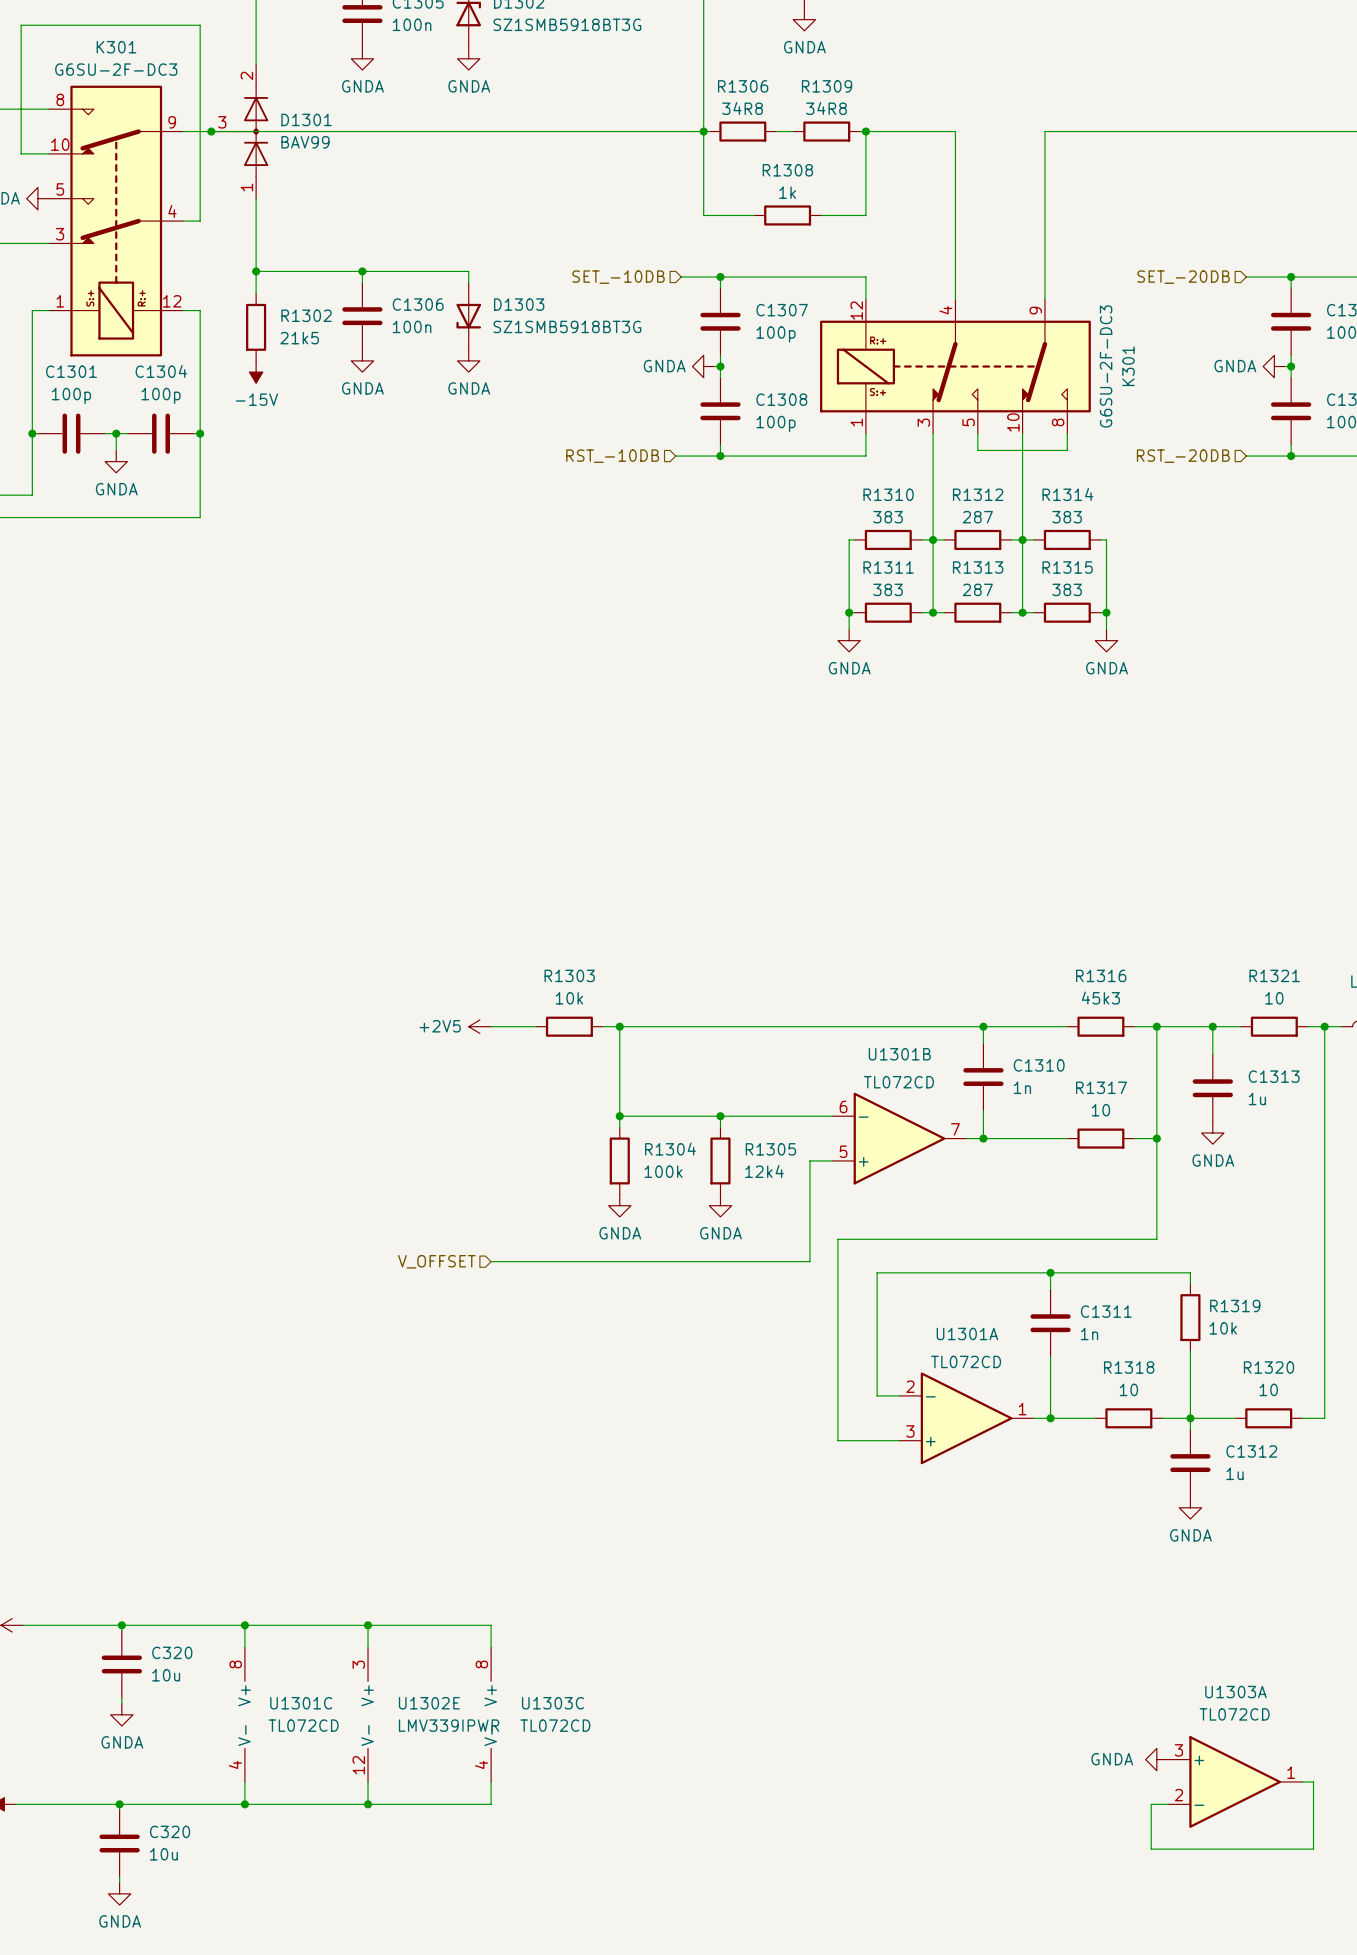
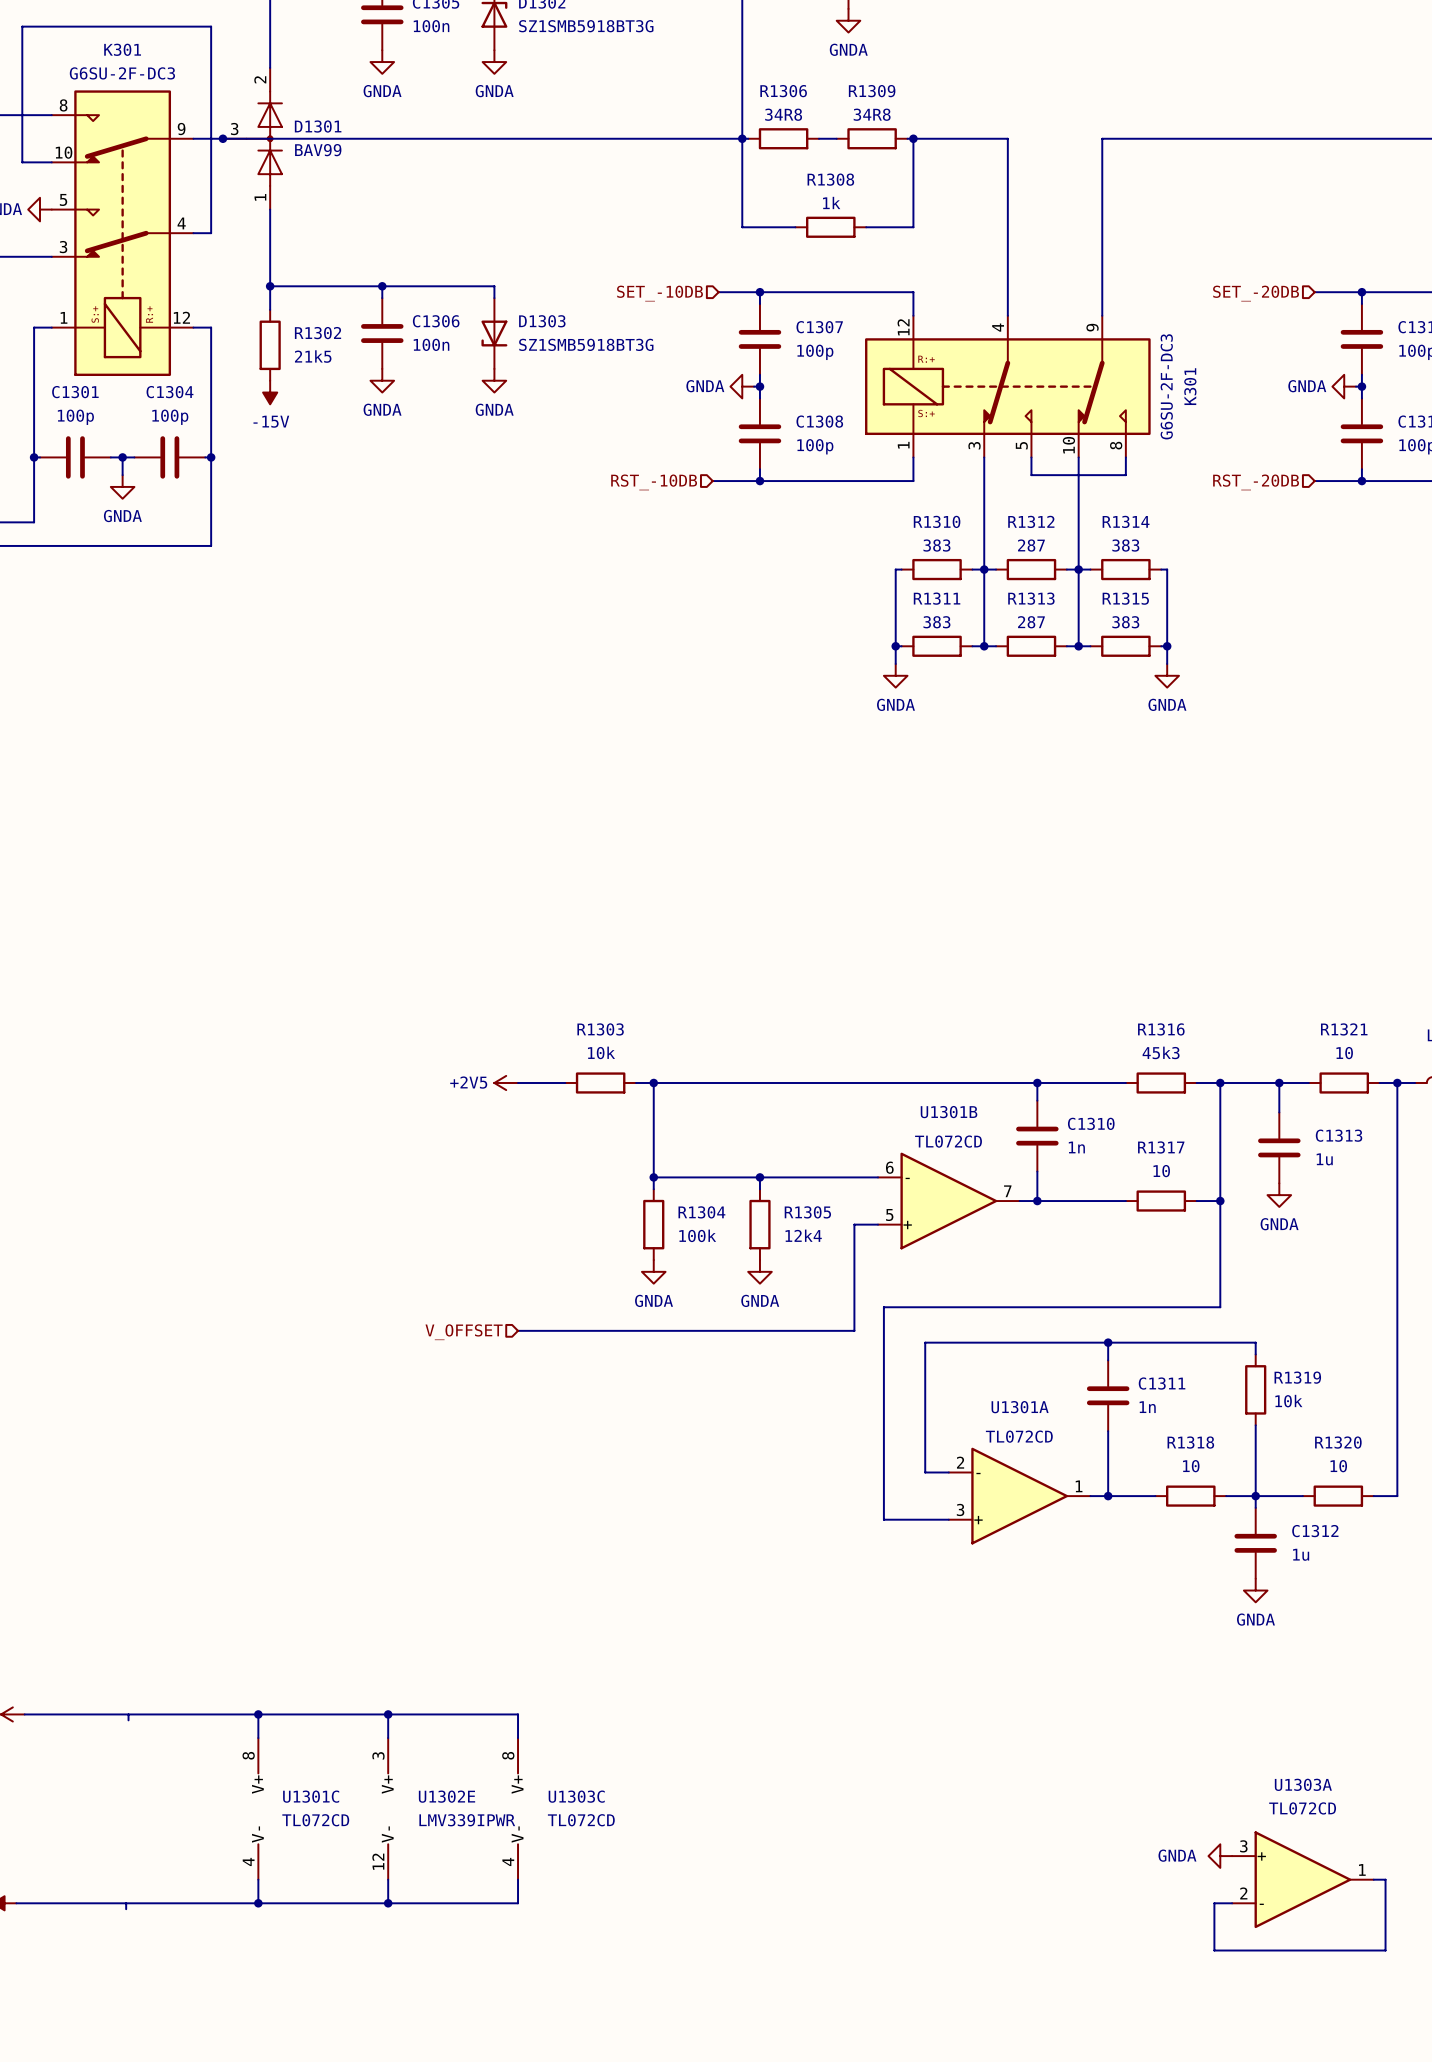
junction: (121, 1625) -> none
C320: 10u (121, 1664) -> none
wire: (121, 1698) (121, 1703) -> none
power symbol: GNDA (121, 1714) -> none
junction: (119, 1804) -> none
C320: 10u (119, 1843) -> none
wire: (119, 1877) (119, 1882) -> none
power symbol: GNDA (119, 1893) -> none

